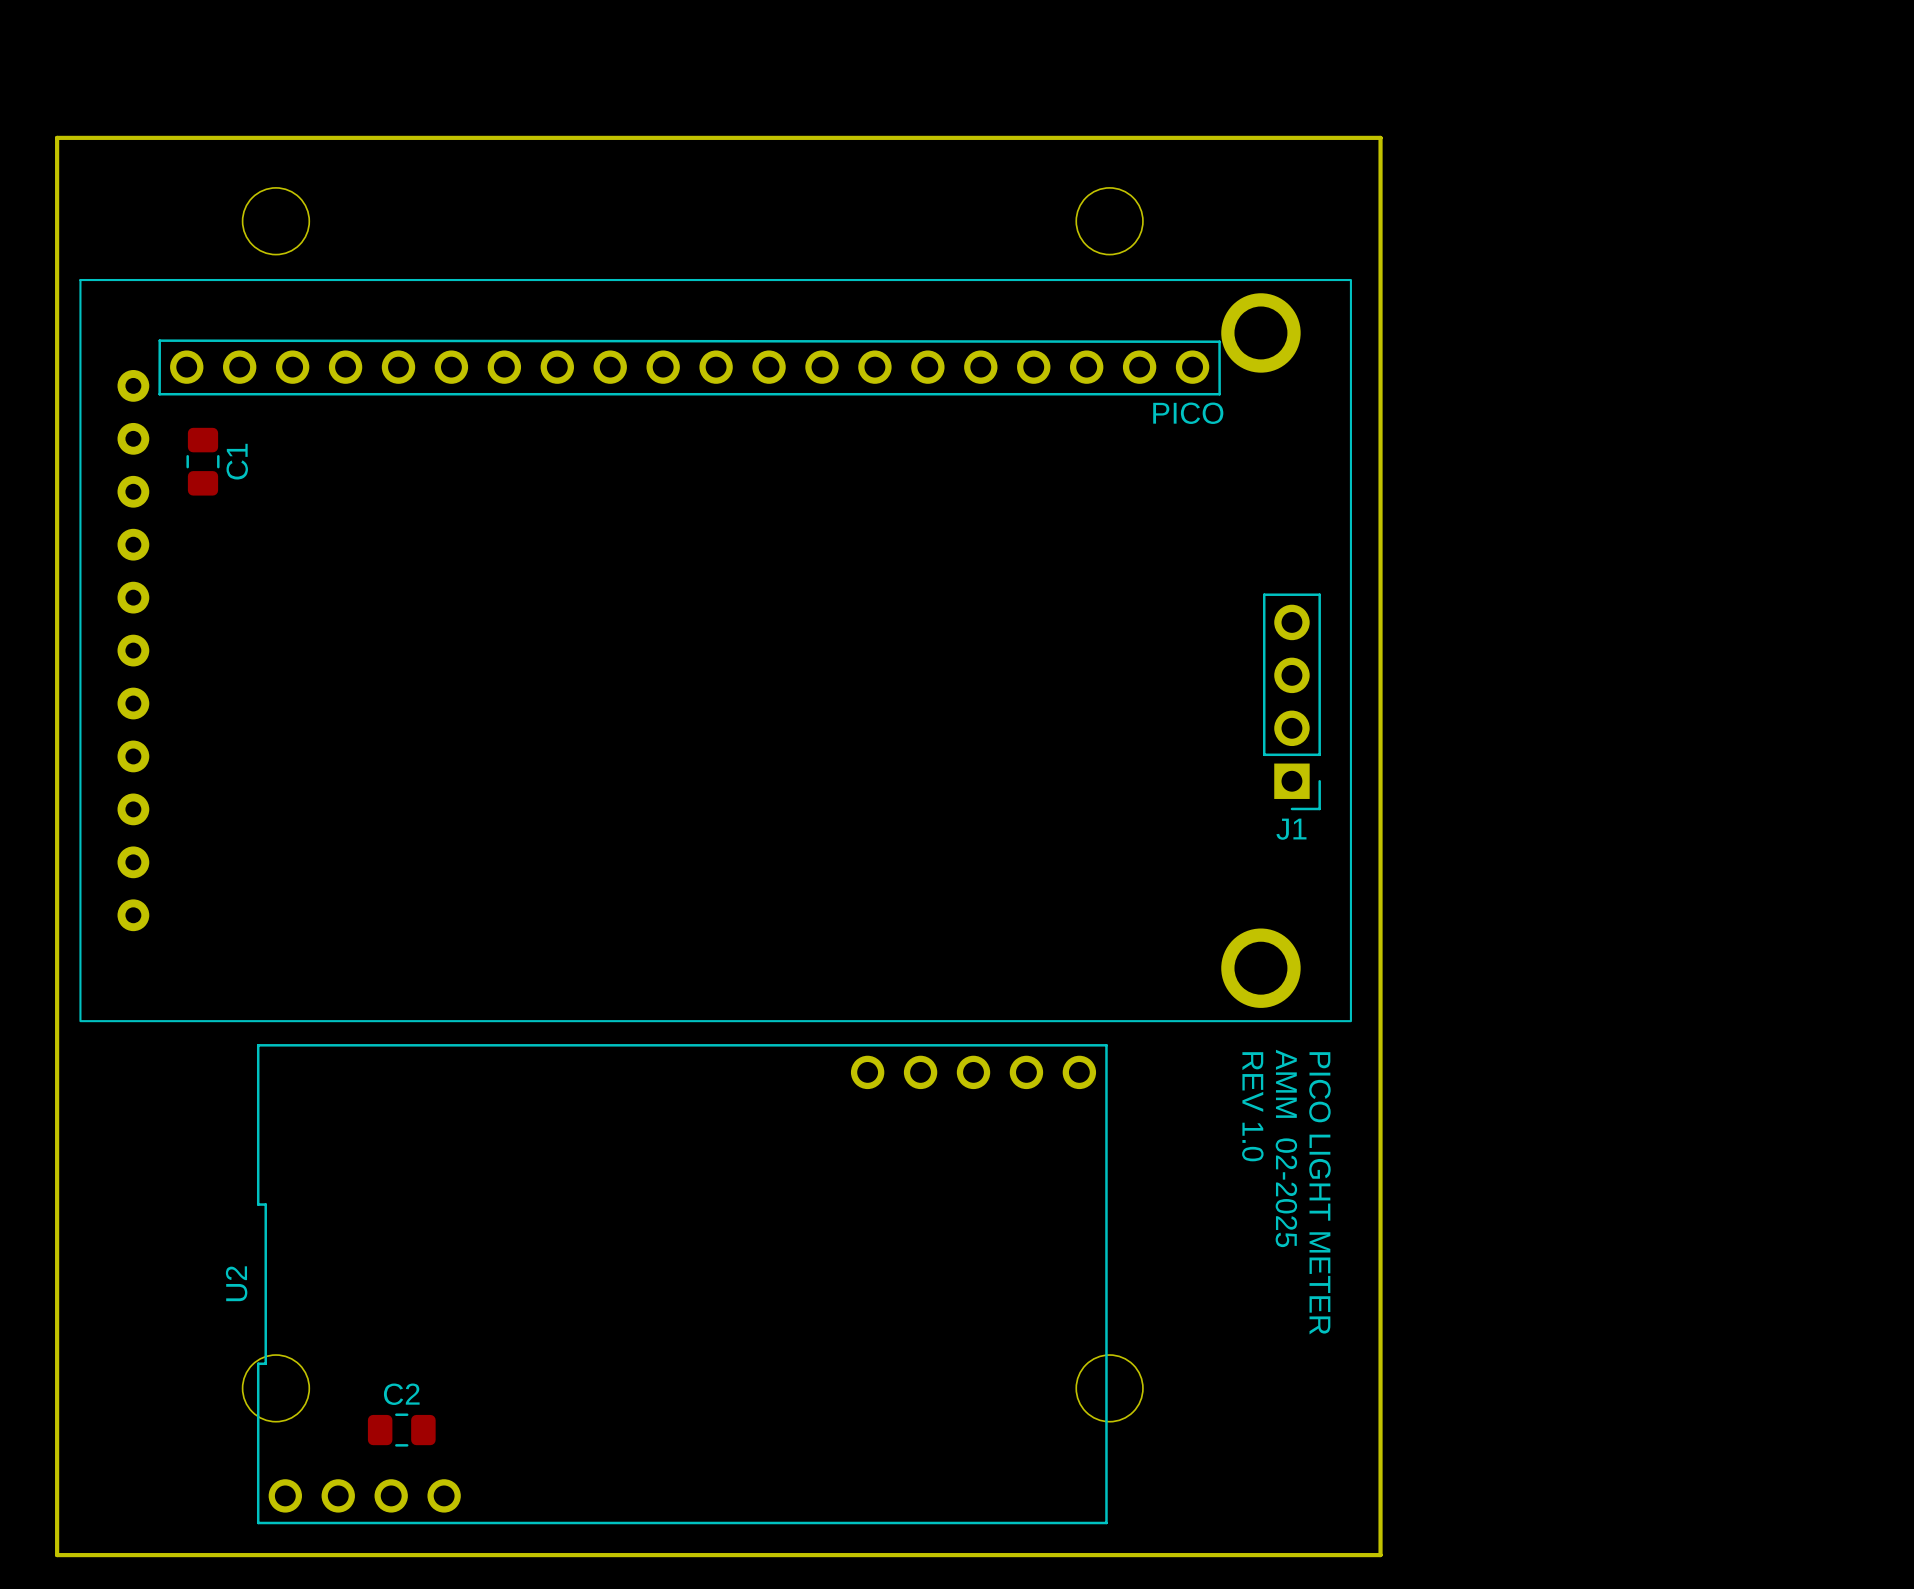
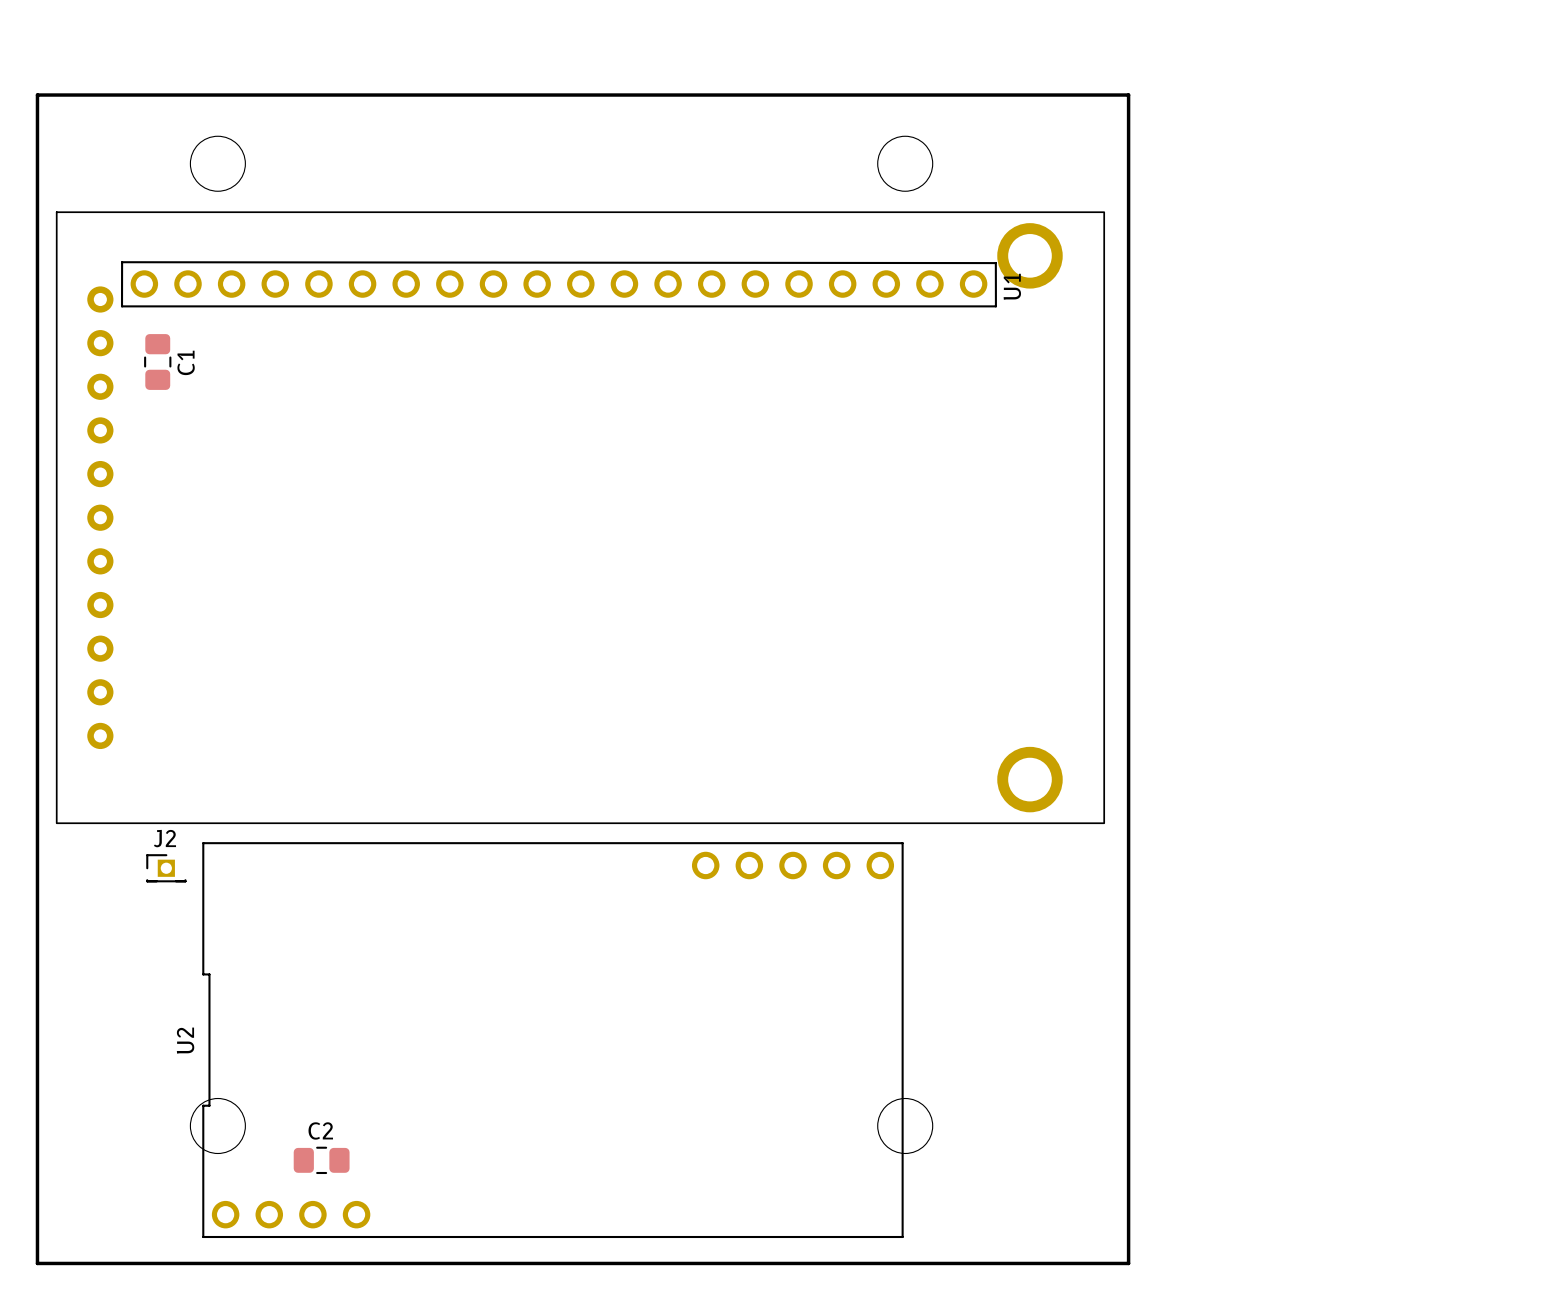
PICO name: PICO (1188, 413) -> U1 (1012, 286)
J1: (1291, 701) -> none
J2: none -> (166, 868)
text: REV 1.0 (1252, 1106) -> none
text: AMM 02-2025 (1286, 1148) -> none
text: PICO LIGHT METER (1319, 1193) -> none

